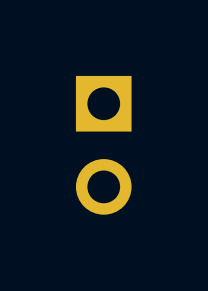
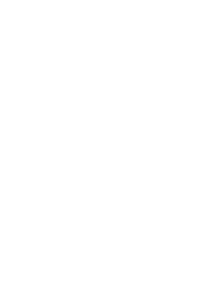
part: (103, 145) -> none

